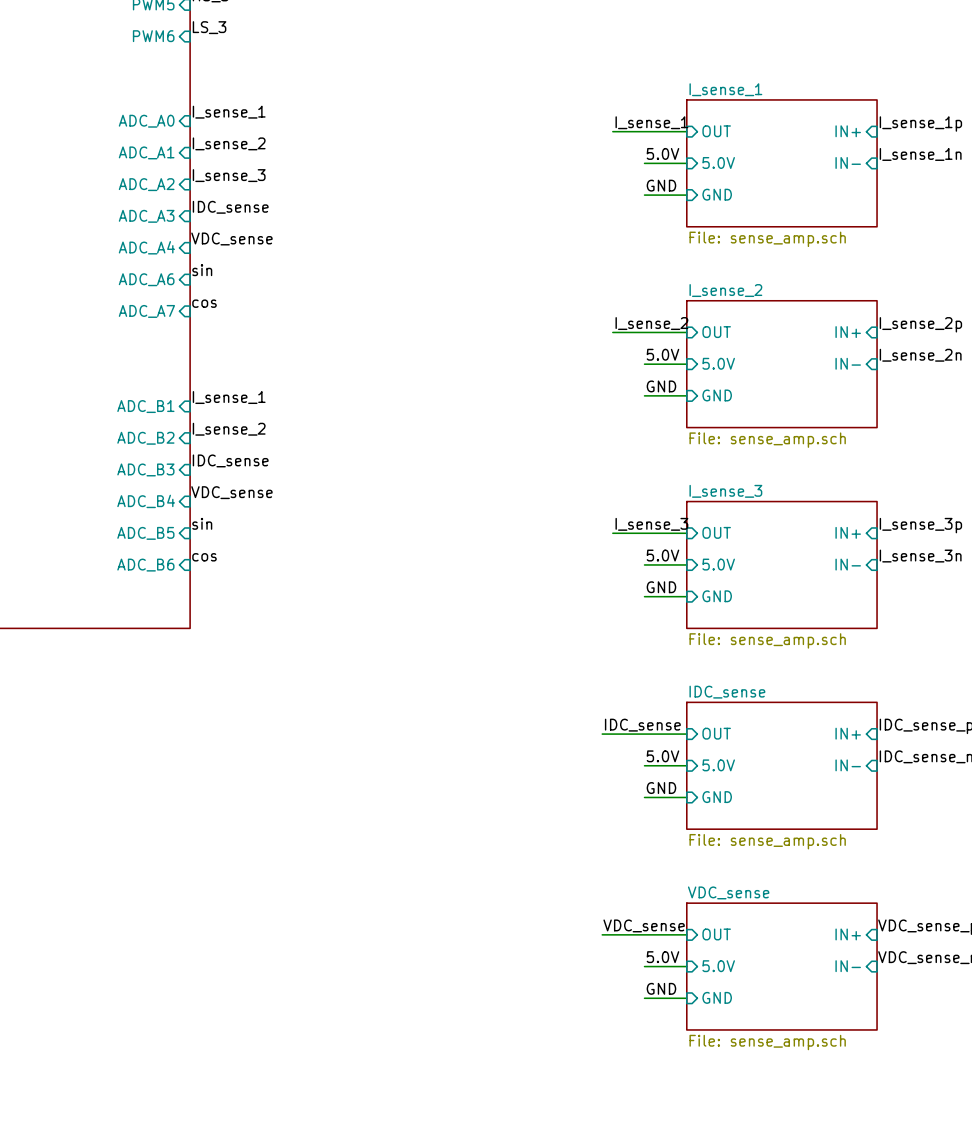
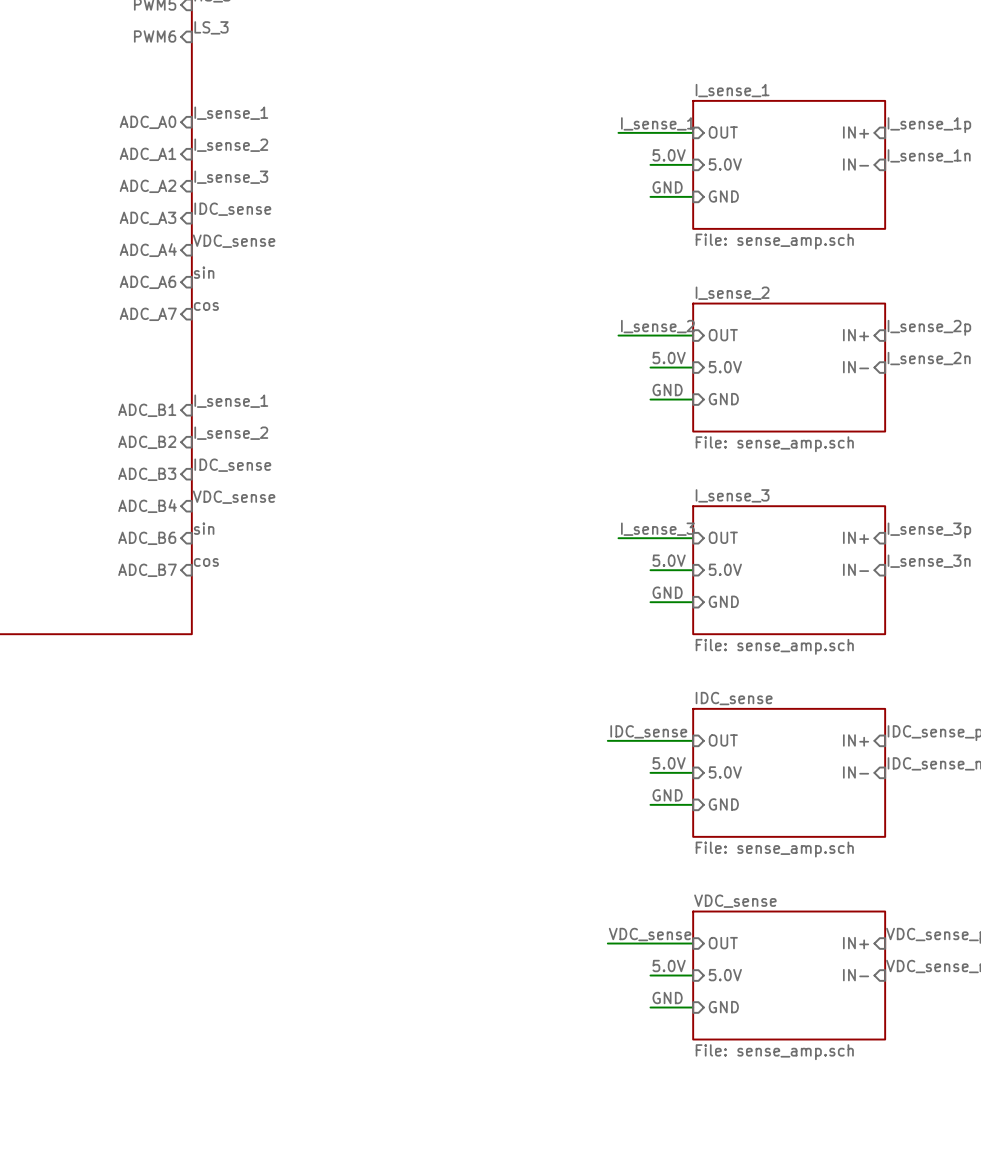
sheet pin: ADC_B5 (145, 533) -> ADC_B6 (147, 538)
sheet pin: ADC_B6 (145, 565) -> ADC_B7 (147, 570)

